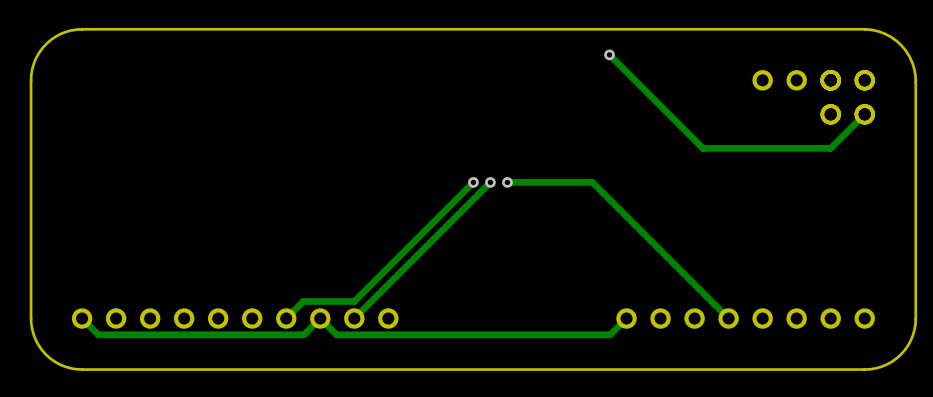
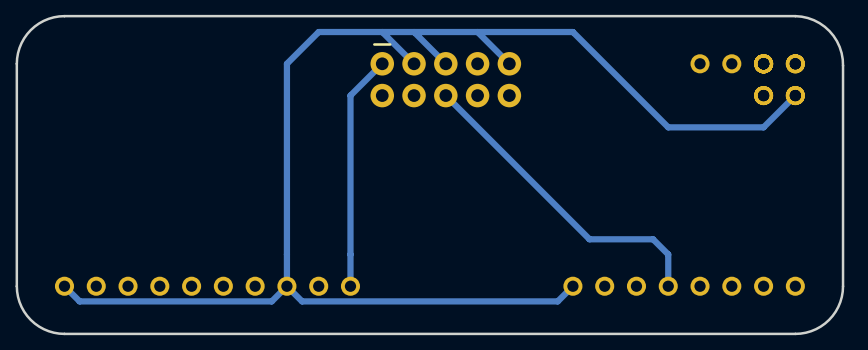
track: none -> (382, 32) (414, 63)
track: none -> (414, 32) (445, 63)
track: none -> (477, 32) (509, 63)
track: (609, 54) (703, 148) (728, 148) -> (286, 286) (286, 63) (318, 32) (572, 32) (668, 127)
via: (609, 54) -> none
track: none -> (382, 63) (350, 95) (350, 286)
part: none -> (445, 75)
track: (473, 182) (354, 301) (303, 301) (286, 318) -> none
via: (473, 182) -> none
track: (490, 182) (354, 318) -> none
via: (490, 182) -> none
track: (507, 182) (592, 182) (728, 318) -> (445, 95) (589, 239) (653, 239) (668, 254) (668, 286)
via: (507, 182) -> none

